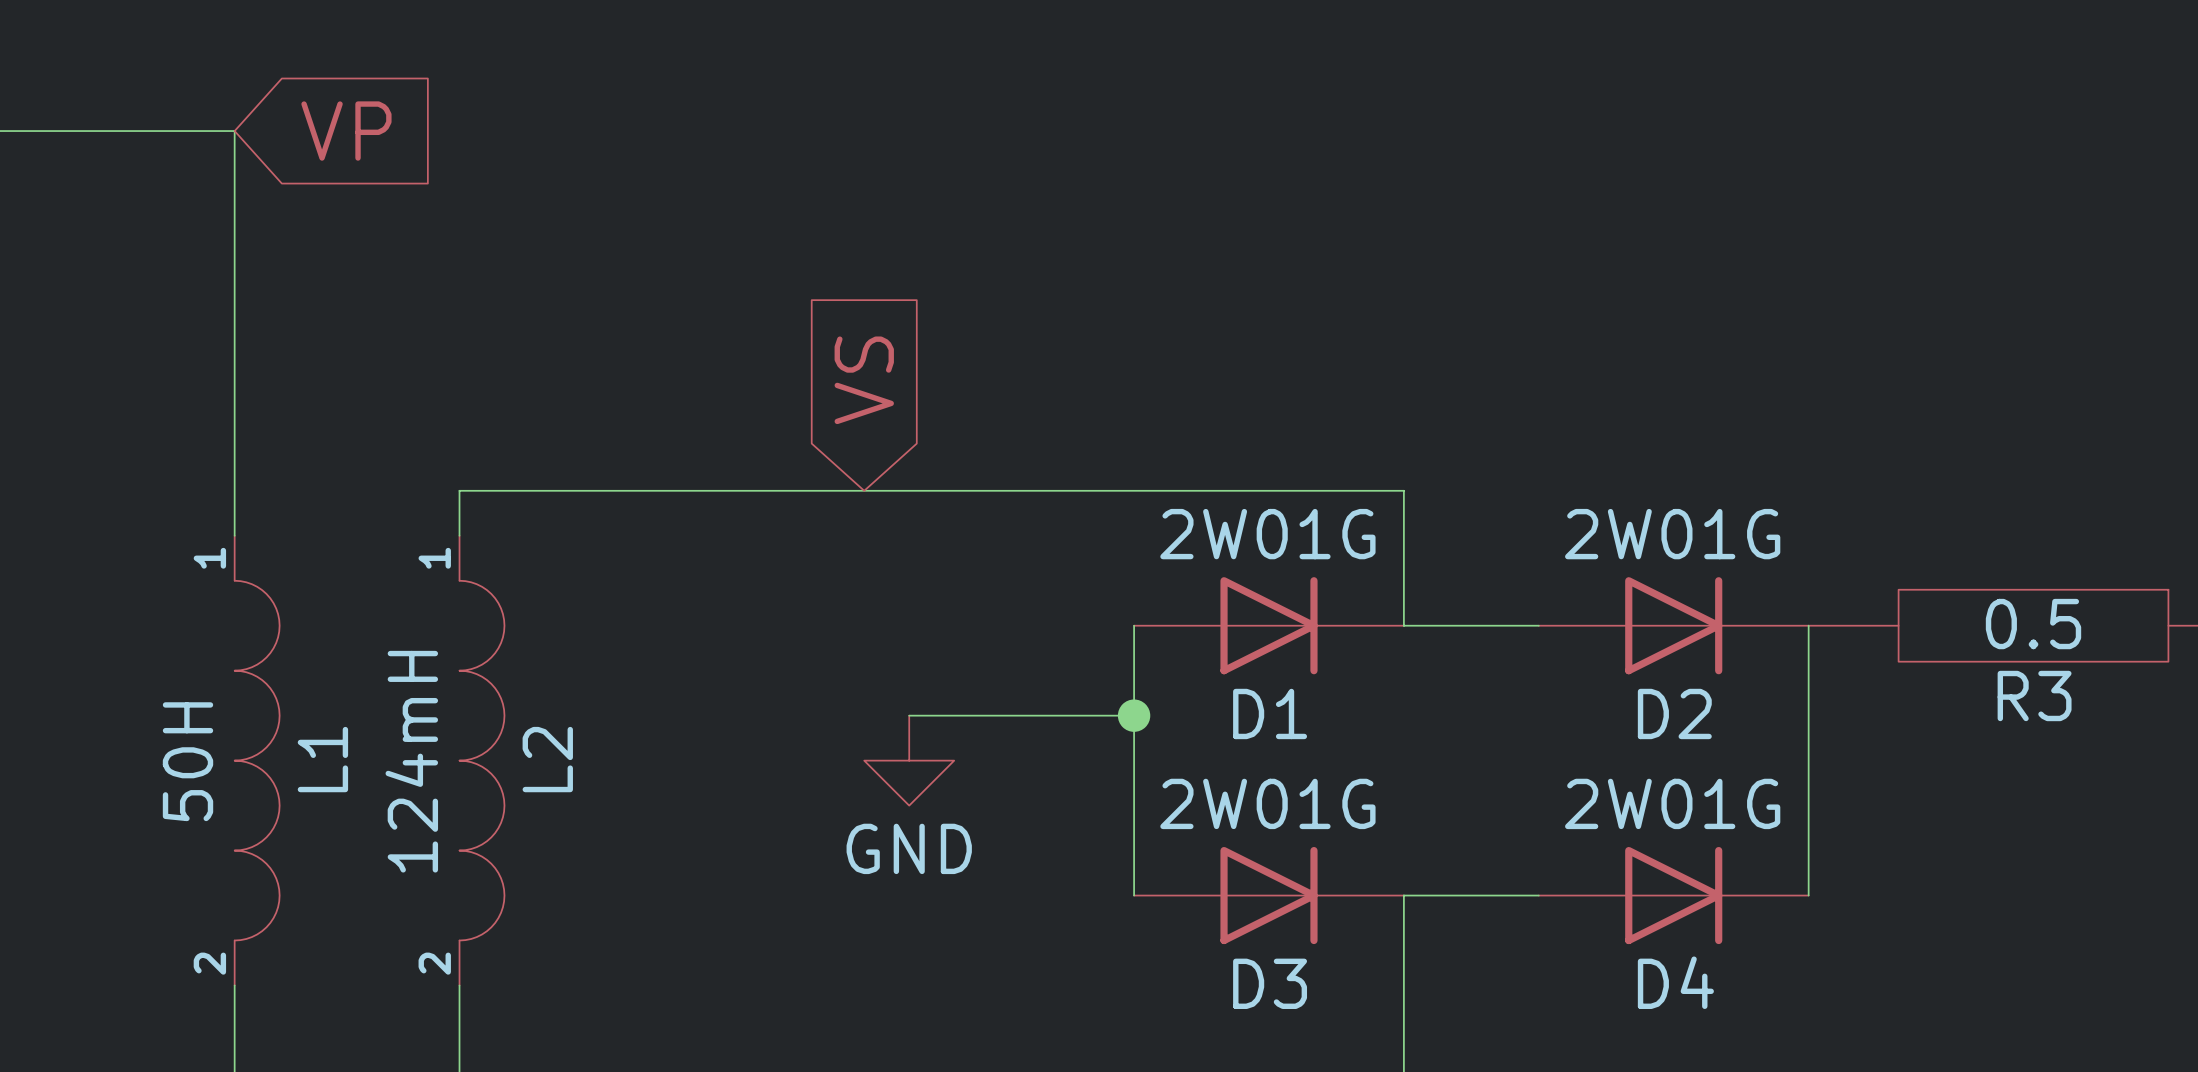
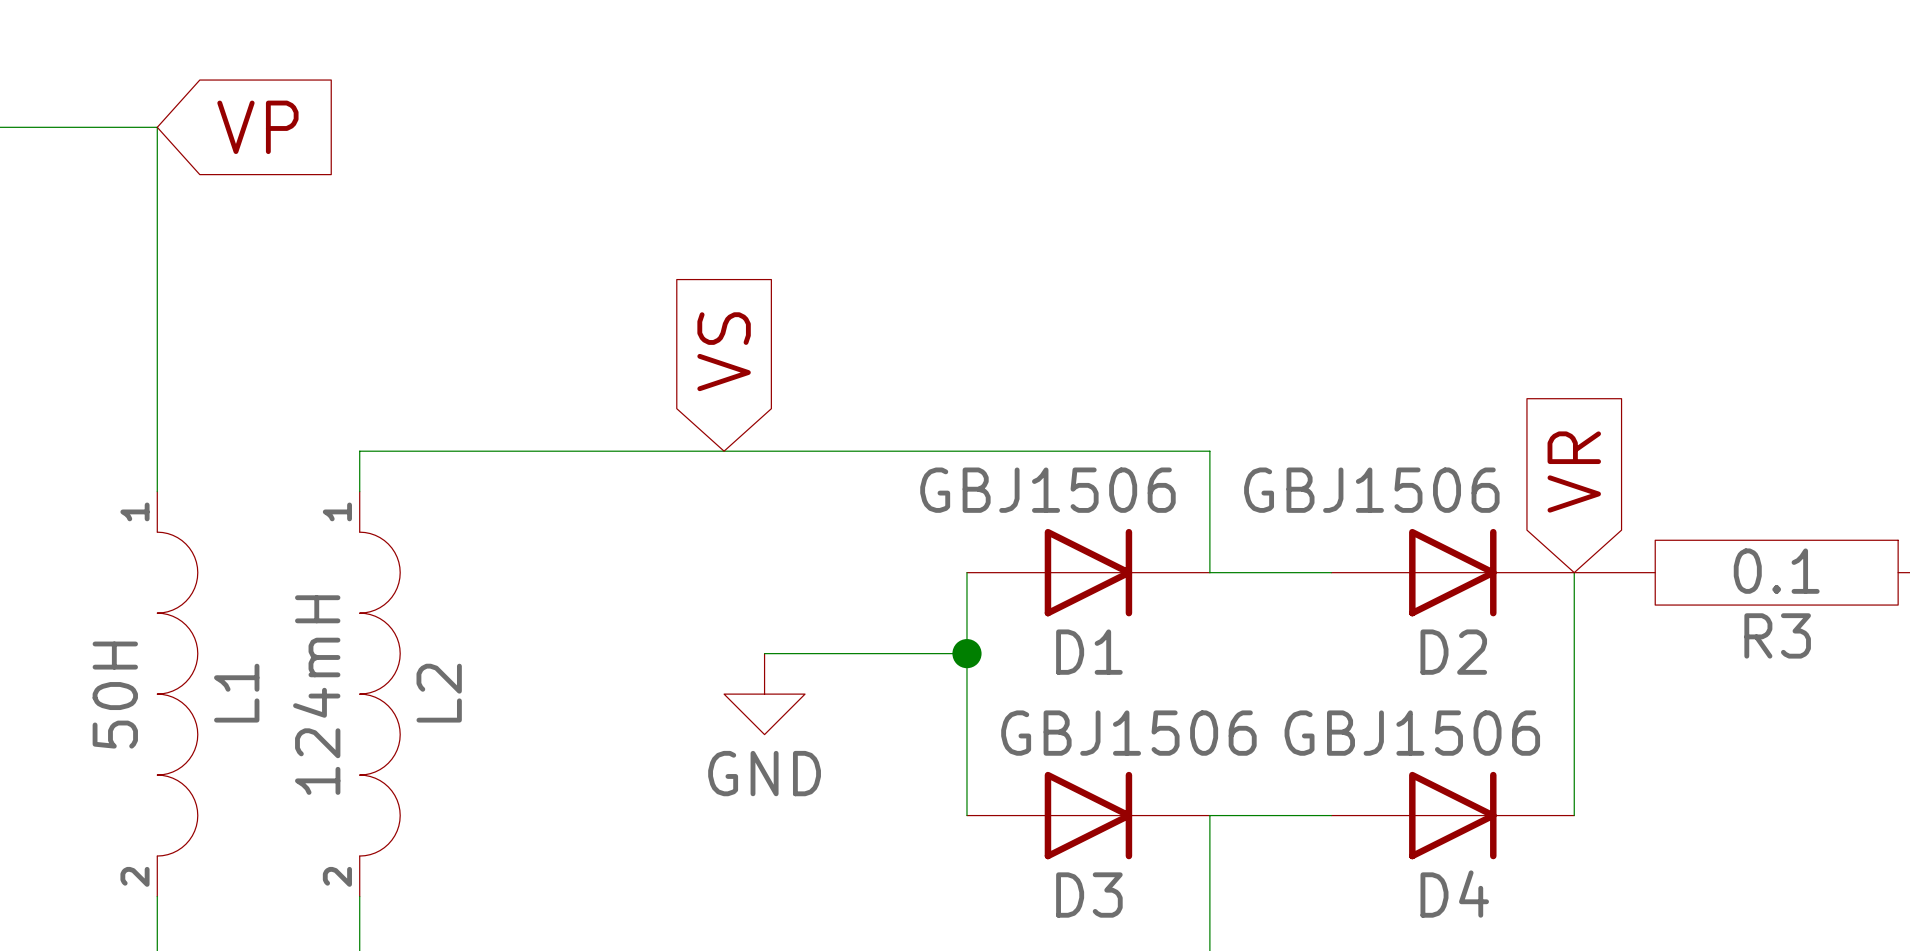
global label: none -> VR (1574, 472)
D1 value: 2W01G (1267, 534) -> GBJ1506 (1047, 490)
D2 value: 2W01G (1672, 534) -> GBJ1506 (1371, 490)
R3 value: 0.5 (2033, 624) -> 0.1 (1776, 571)
D3 value: 2W01G (1267, 803) -> GBJ1506 (1128, 733)
D4 value: 2W01G (1672, 803) -> GBJ1506 (1412, 733)

